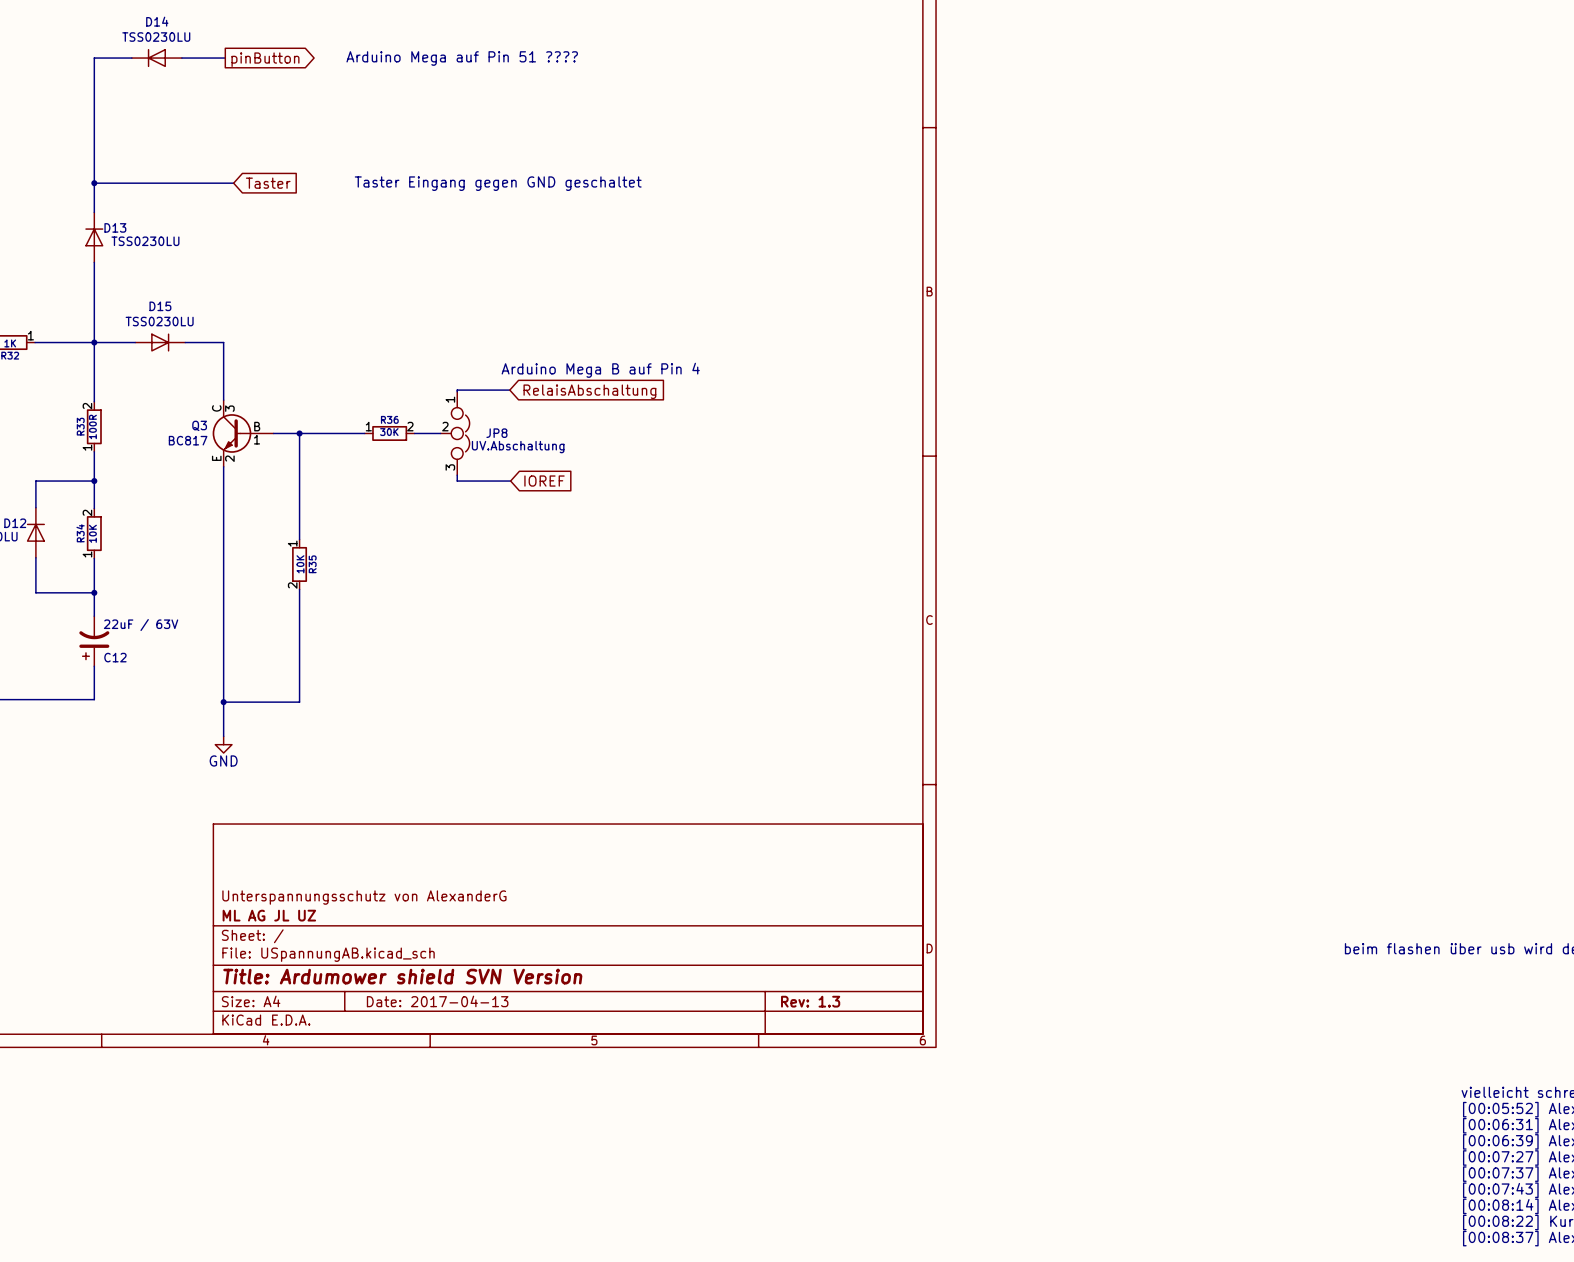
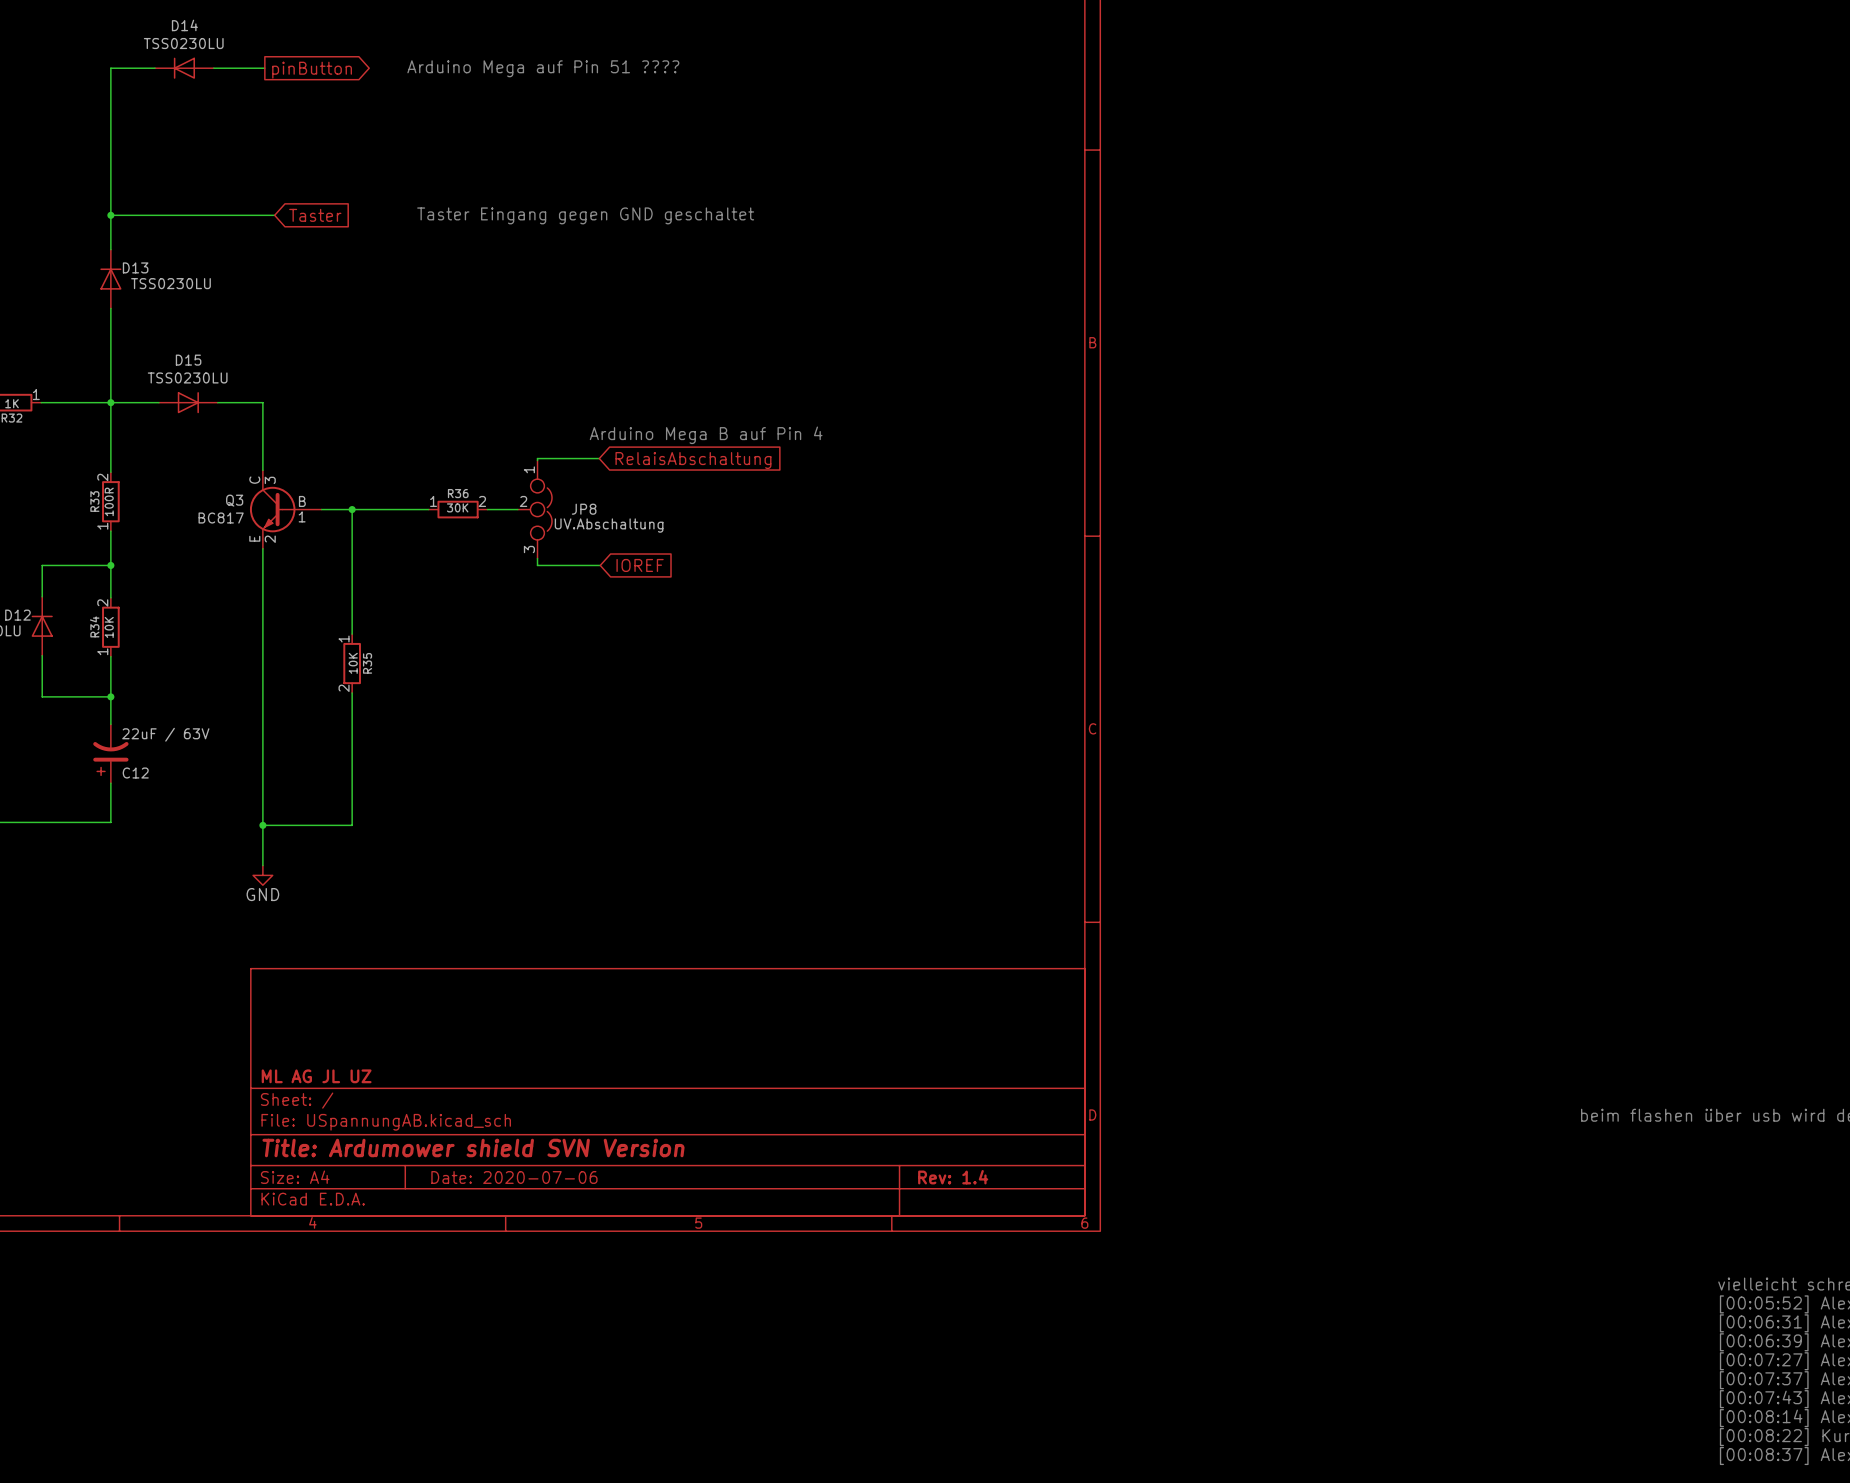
title block: Unterspannungsschutz von AlexanderG (364, 897) -> none
title block: Date: 2017-04-13 (437, 1001) -> Date: 2020-07-06 (514, 1177)
title block: Rev: 1.3 (810, 1001) -> Rev: 1.4 (953, 1177)

